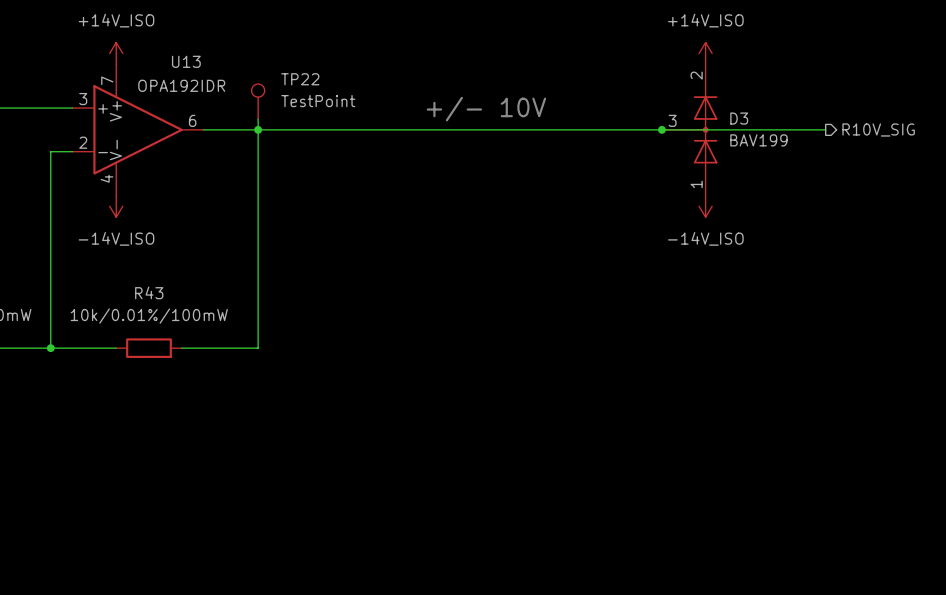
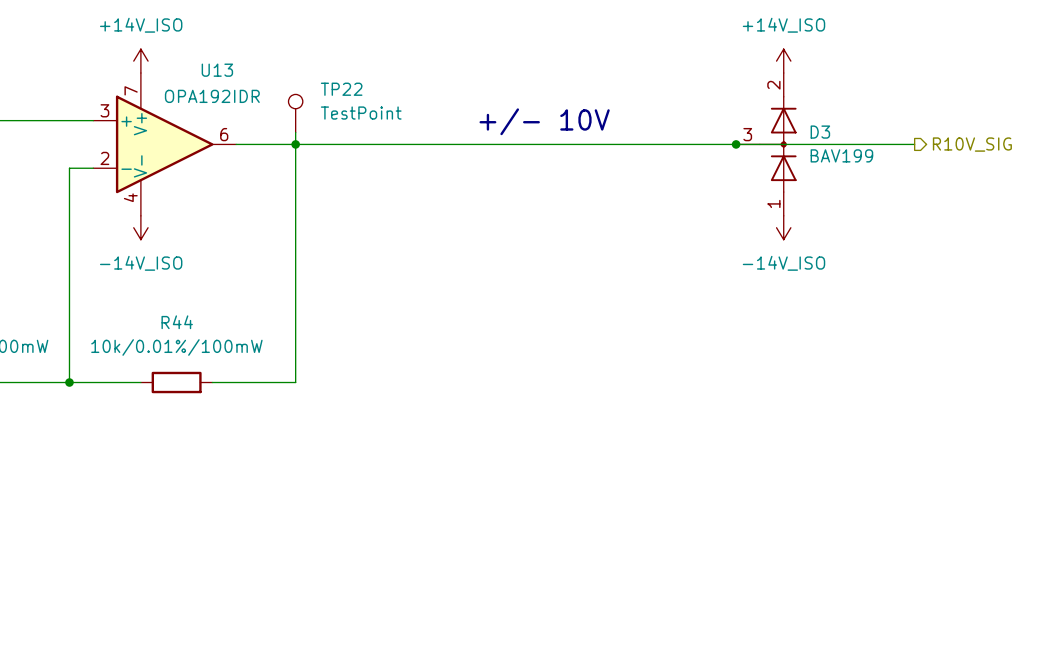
R43 name: R43 (149, 292) -> R44 (177, 322)

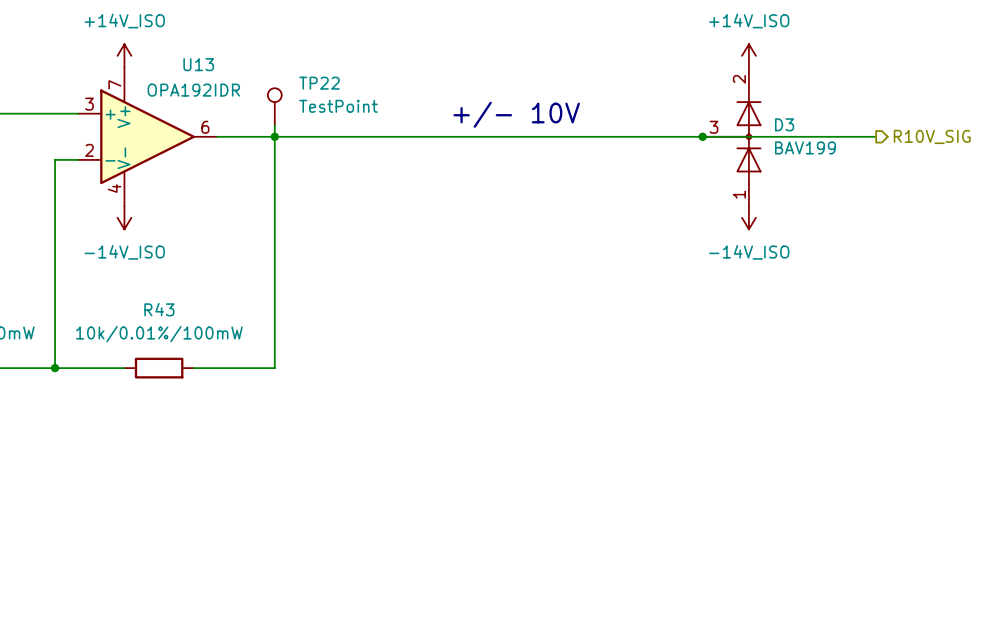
R44 name: R44 (177, 322) -> R43 (159, 309)

